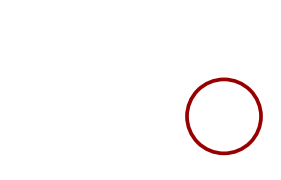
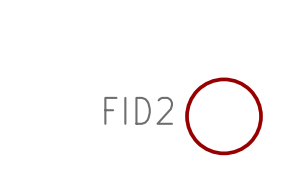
FID2 name: none -> FID2 (138, 110)

